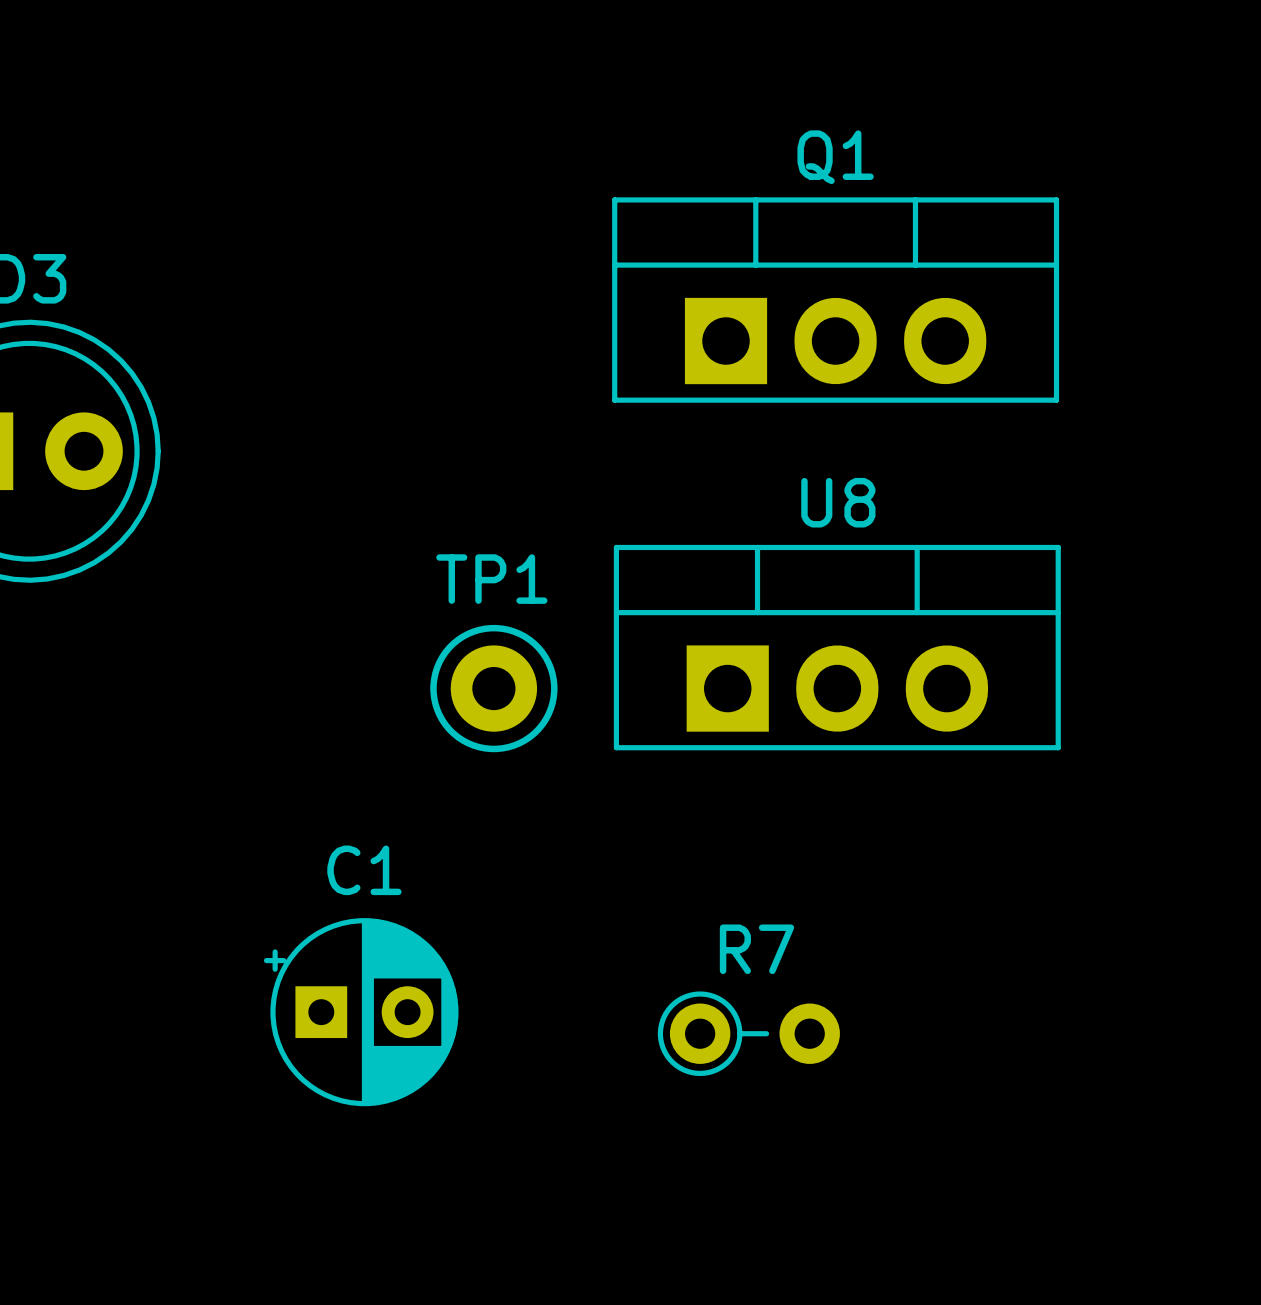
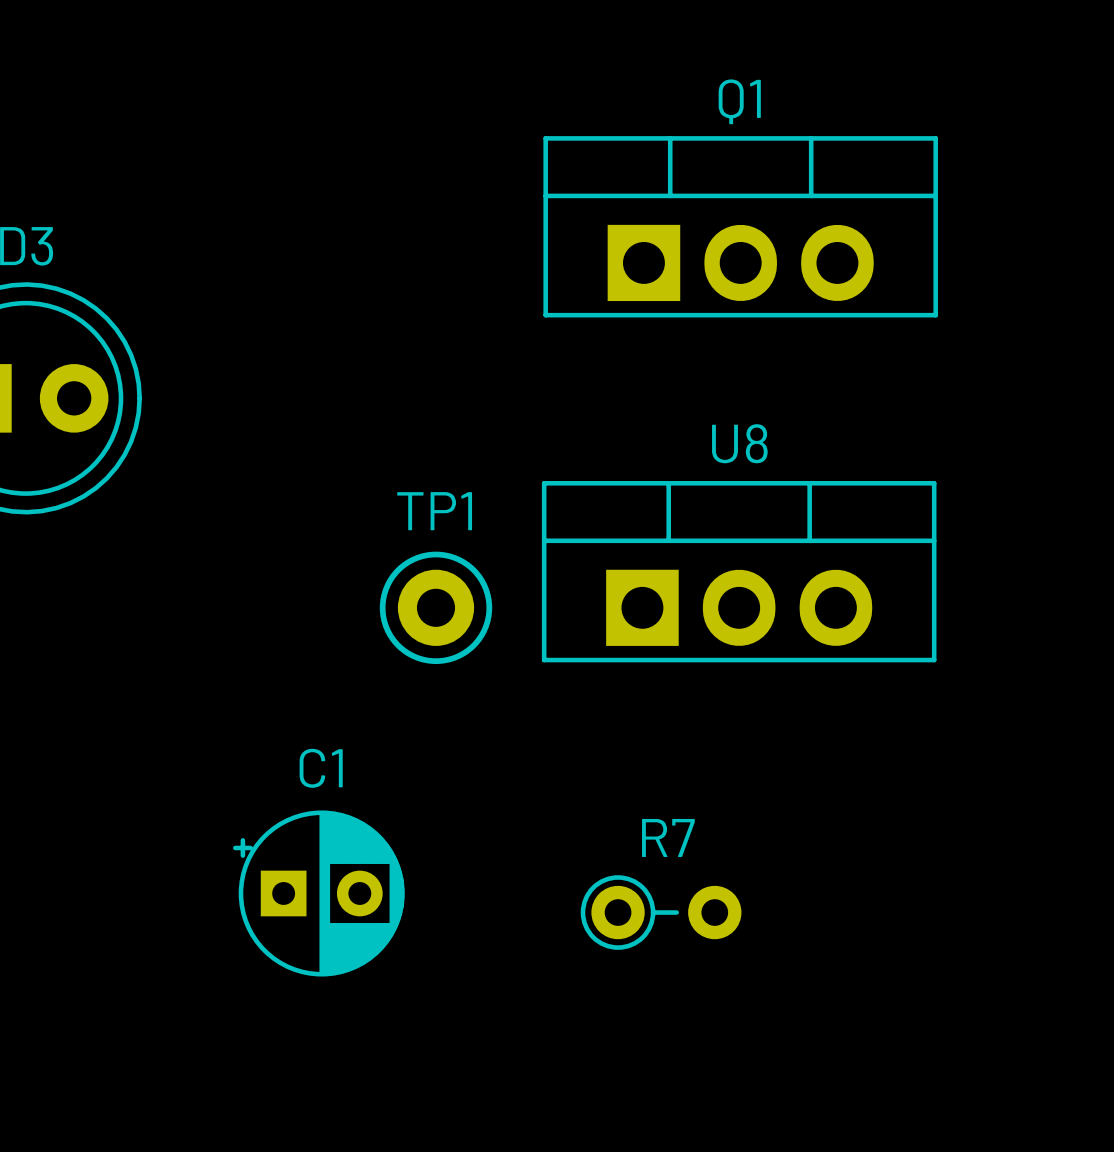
Q1 position: (835, 300) -> (740, 226)

